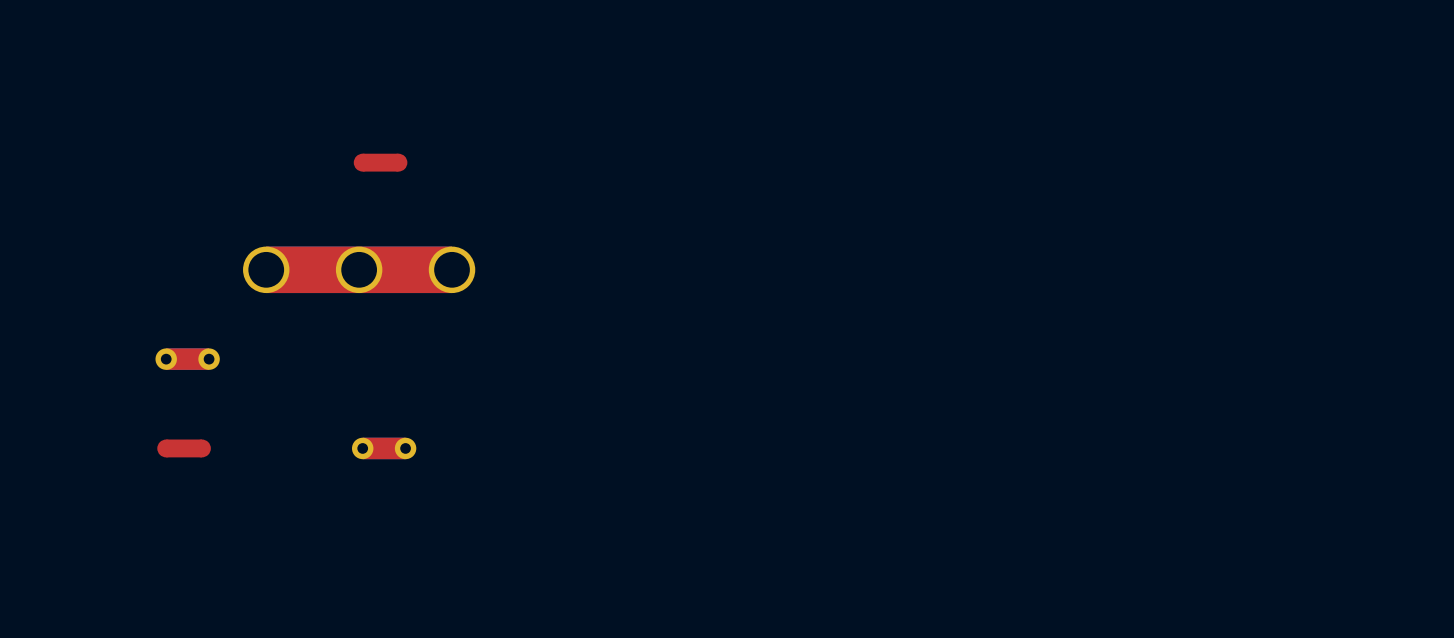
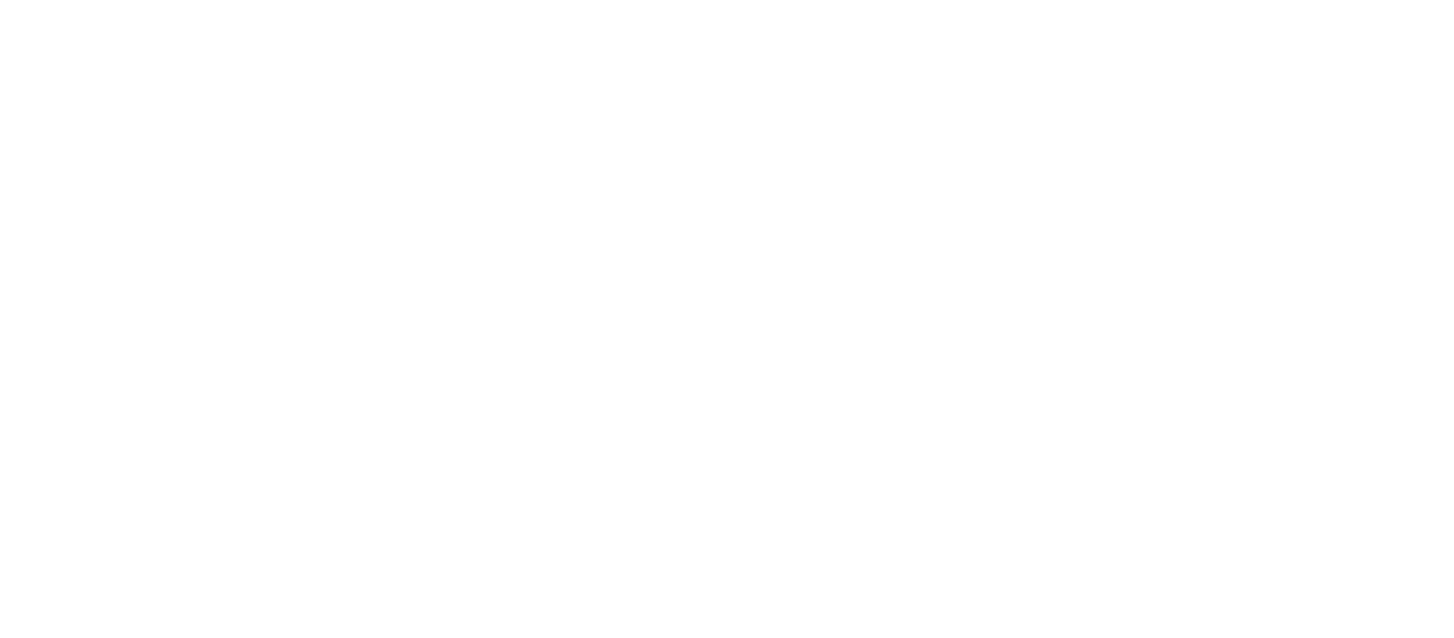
part: (380, 162) -> none
part: (359, 269) -> none
part: (187, 359) -> none
part: (184, 448) -> none
part: (384, 448) -> none

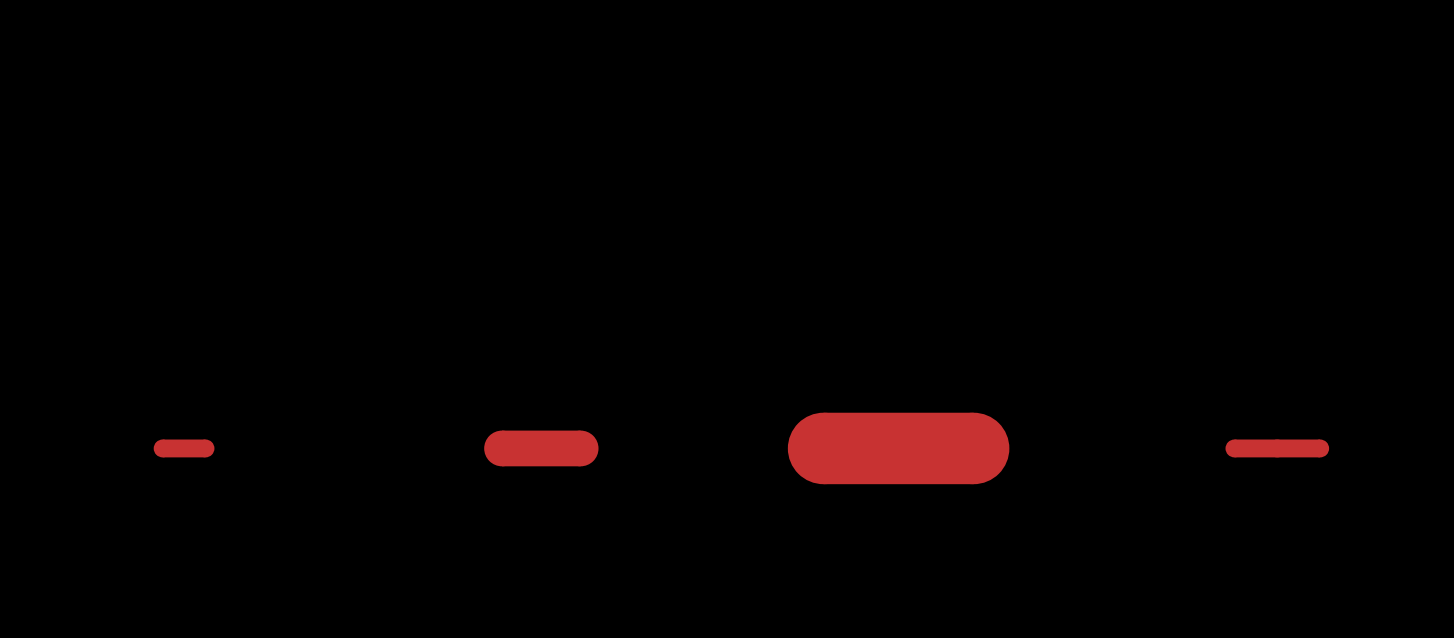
part: none -> (184, 448)
part: none -> (541, 448)
part: none -> (898, 448)
part: none -> (1277, 448)

